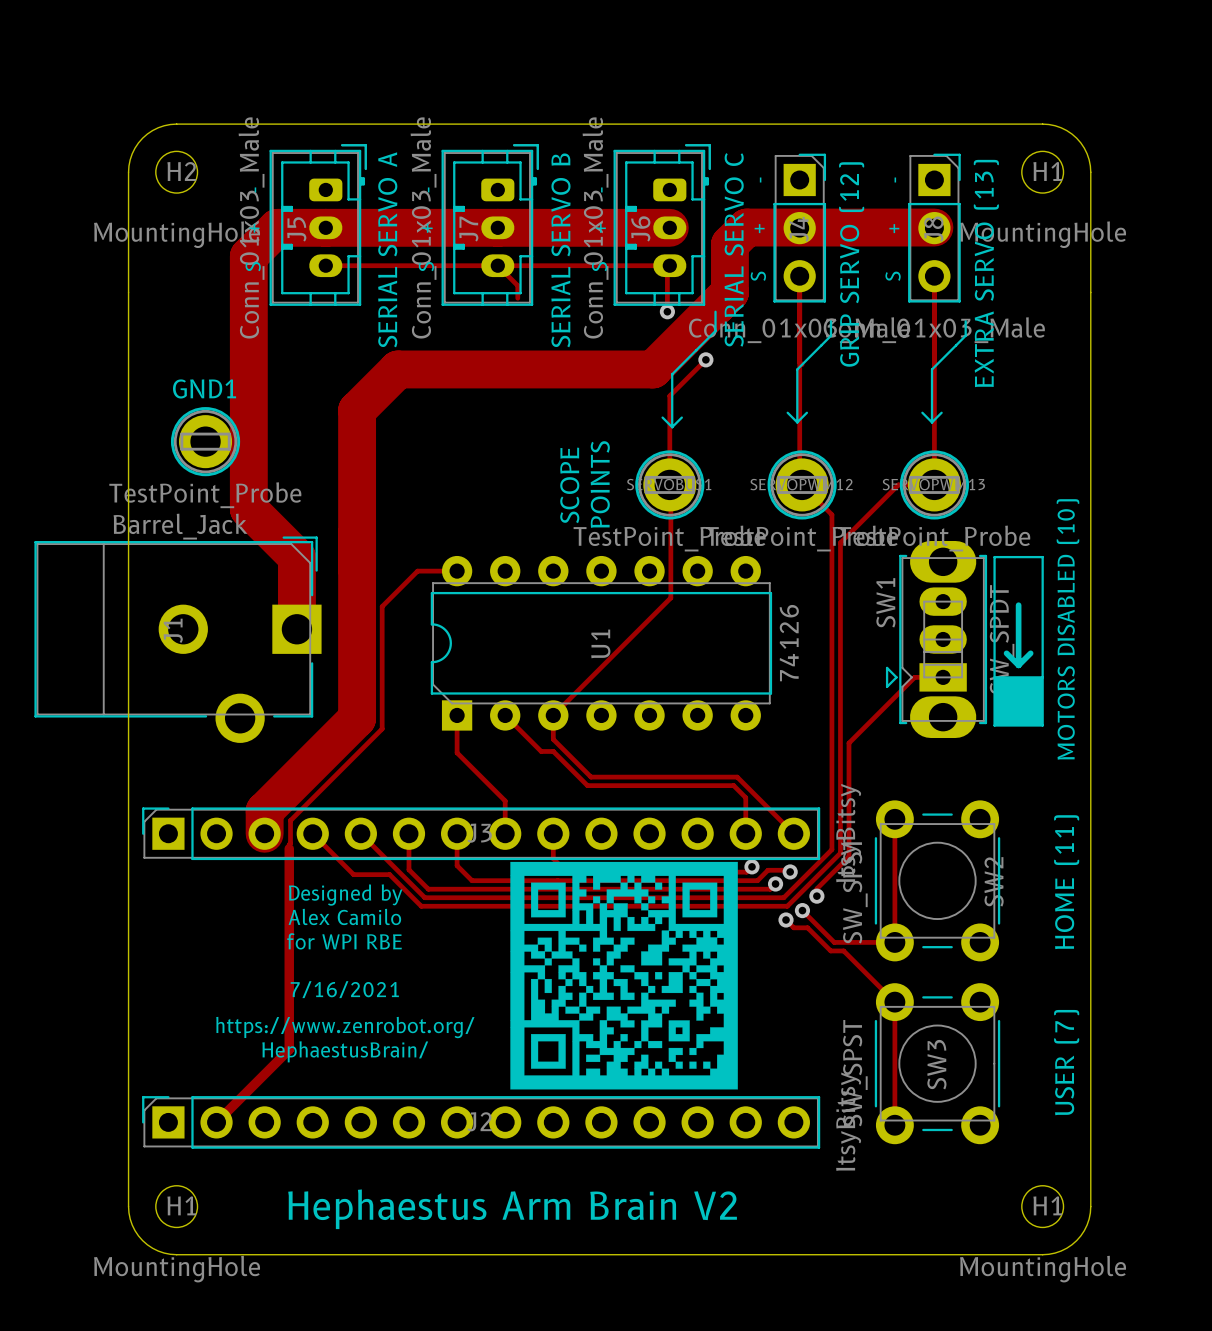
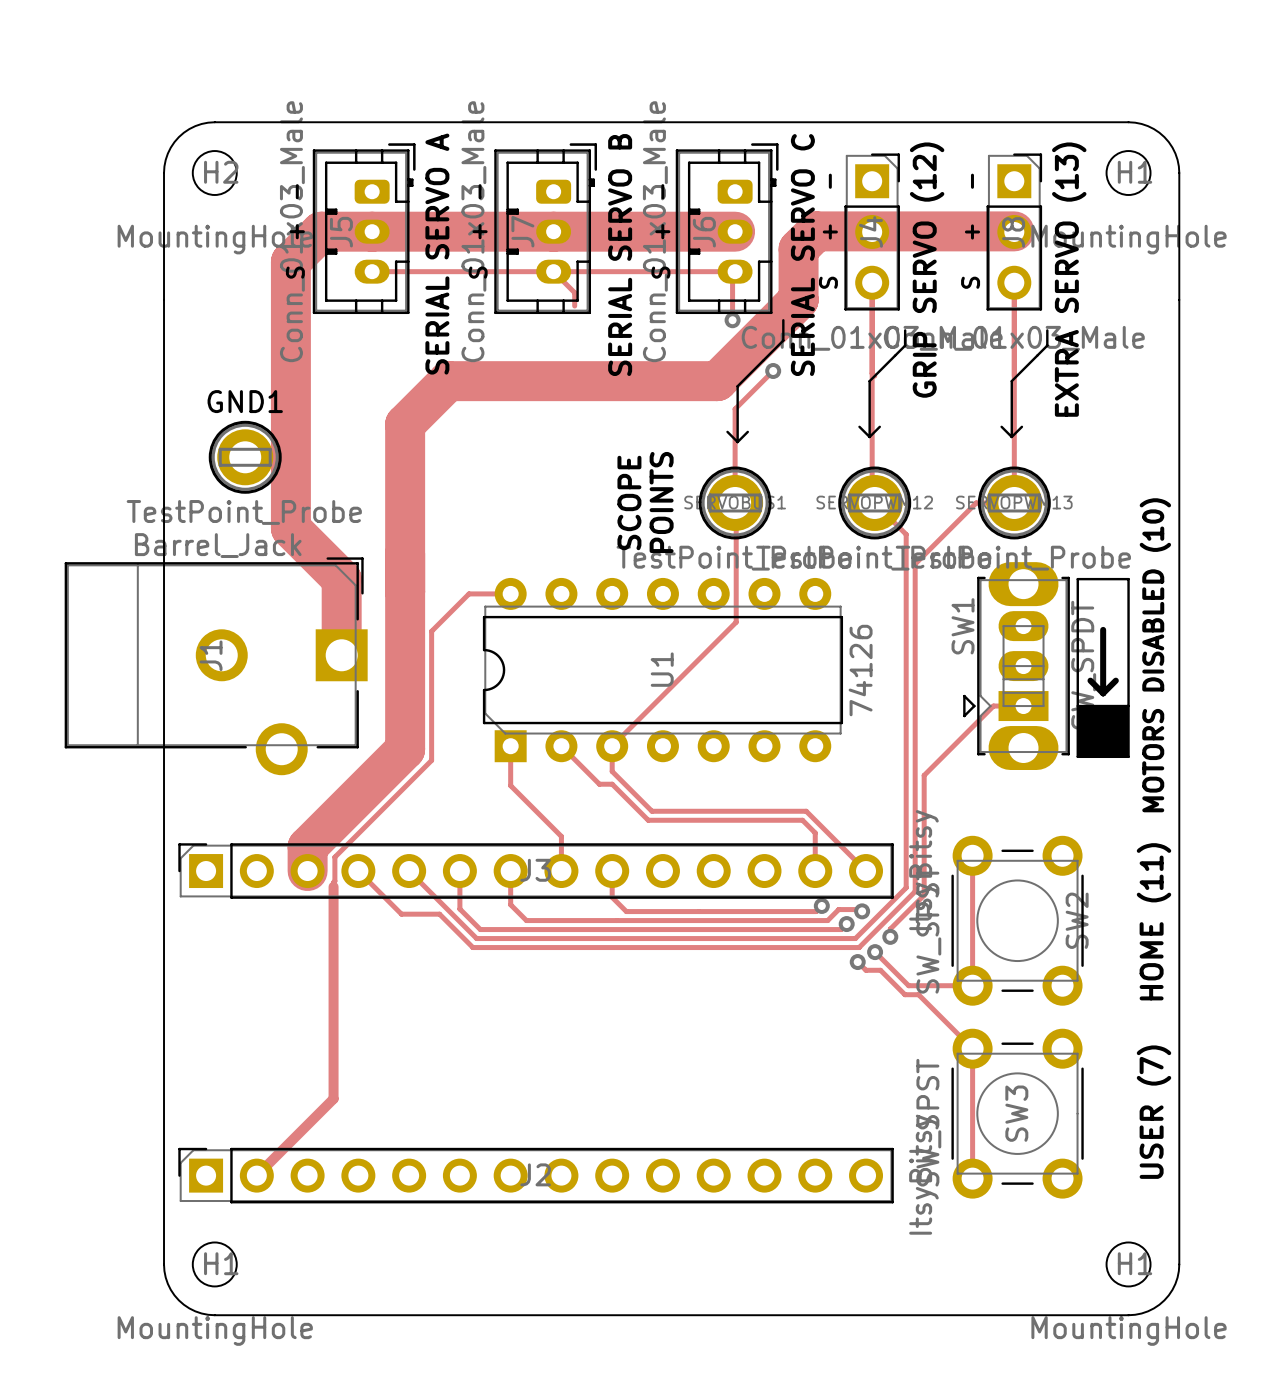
drawing: [510, 861, 738, 1090] -> none
text: Designed by (345, 895) -> none
text: Alex Camilo (344, 916) -> none
text: for WPI RBE (344, 941) -> none
text: 7/16/2021 (344, 989) -> none
text: https://www.zenrobot.org/ (345, 1027) -> none
text: HephaestusBrain/ (345, 1051) -> none
text: Hephaestus Arm Brain V2 (512, 1209) -> none

